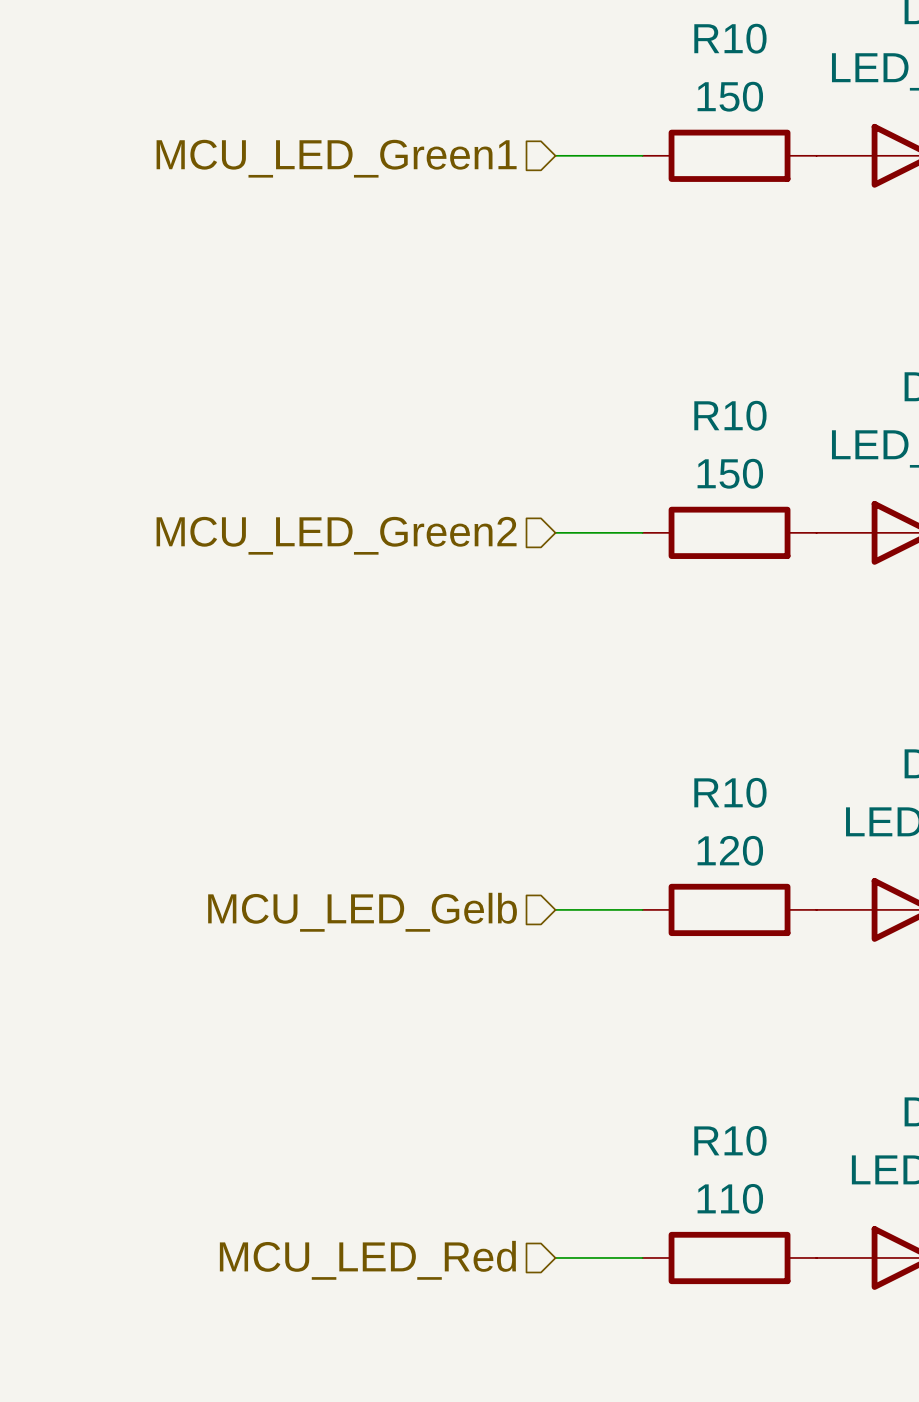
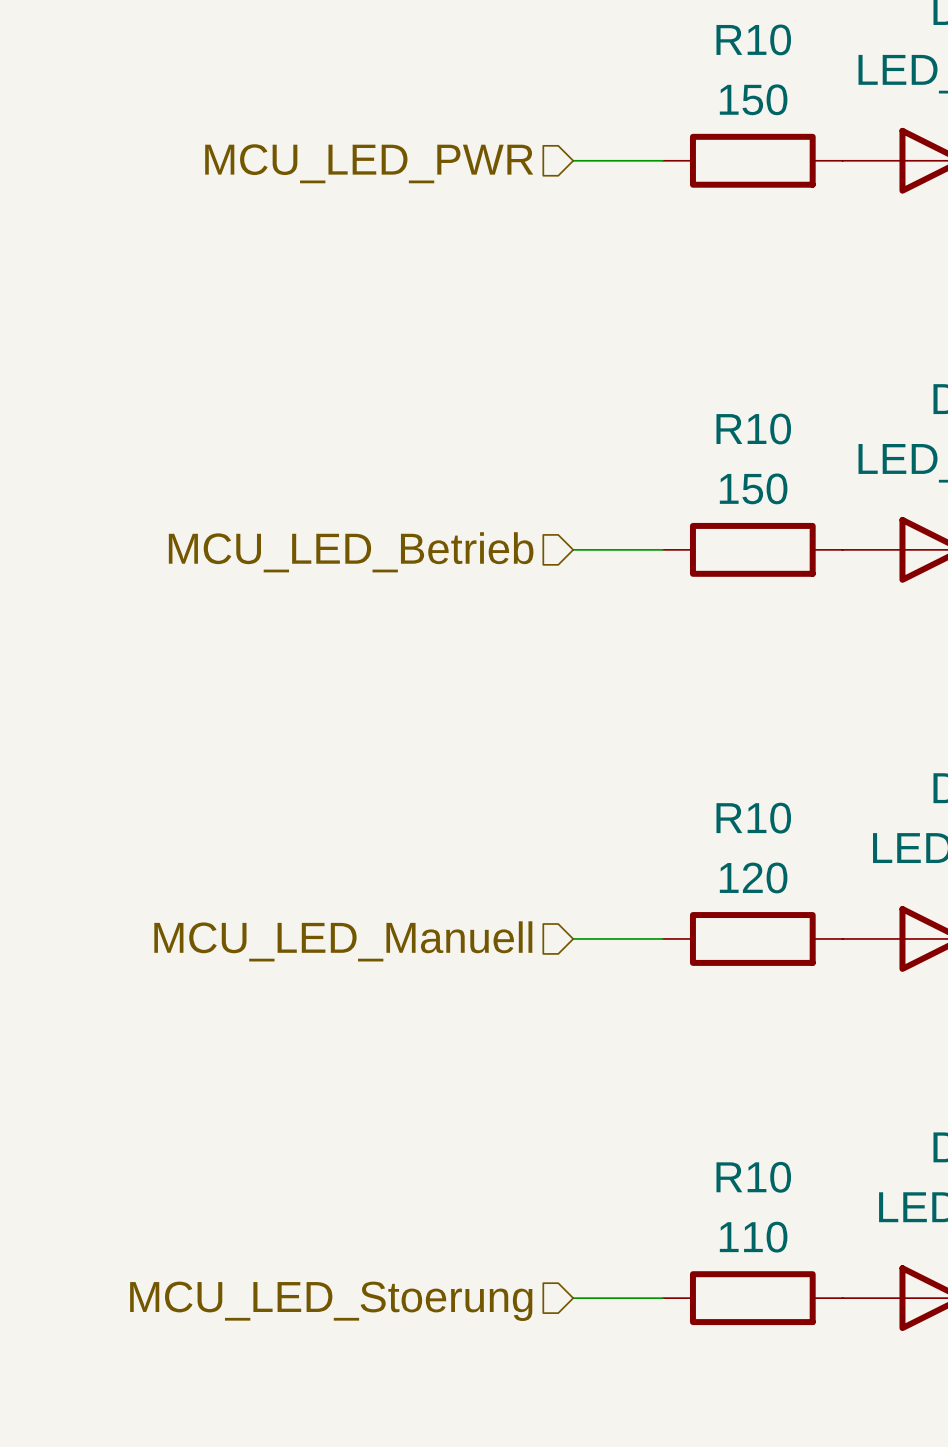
hierarchical label: MCU_LED_Green1 (336, 158) -> MCU_LED_PWR (369, 163)
hierarchical label: MCU_LED_Green2 (336, 535) -> MCU_LED_Betrieb (351, 552)
hierarchical label: MCU_LED_Gelb (362, 912) -> MCU_LED_Manuell (343, 941)
hierarchical label: MCU_LED_Red (367, 1260) -> MCU_LED_Stoerung (331, 1301)

